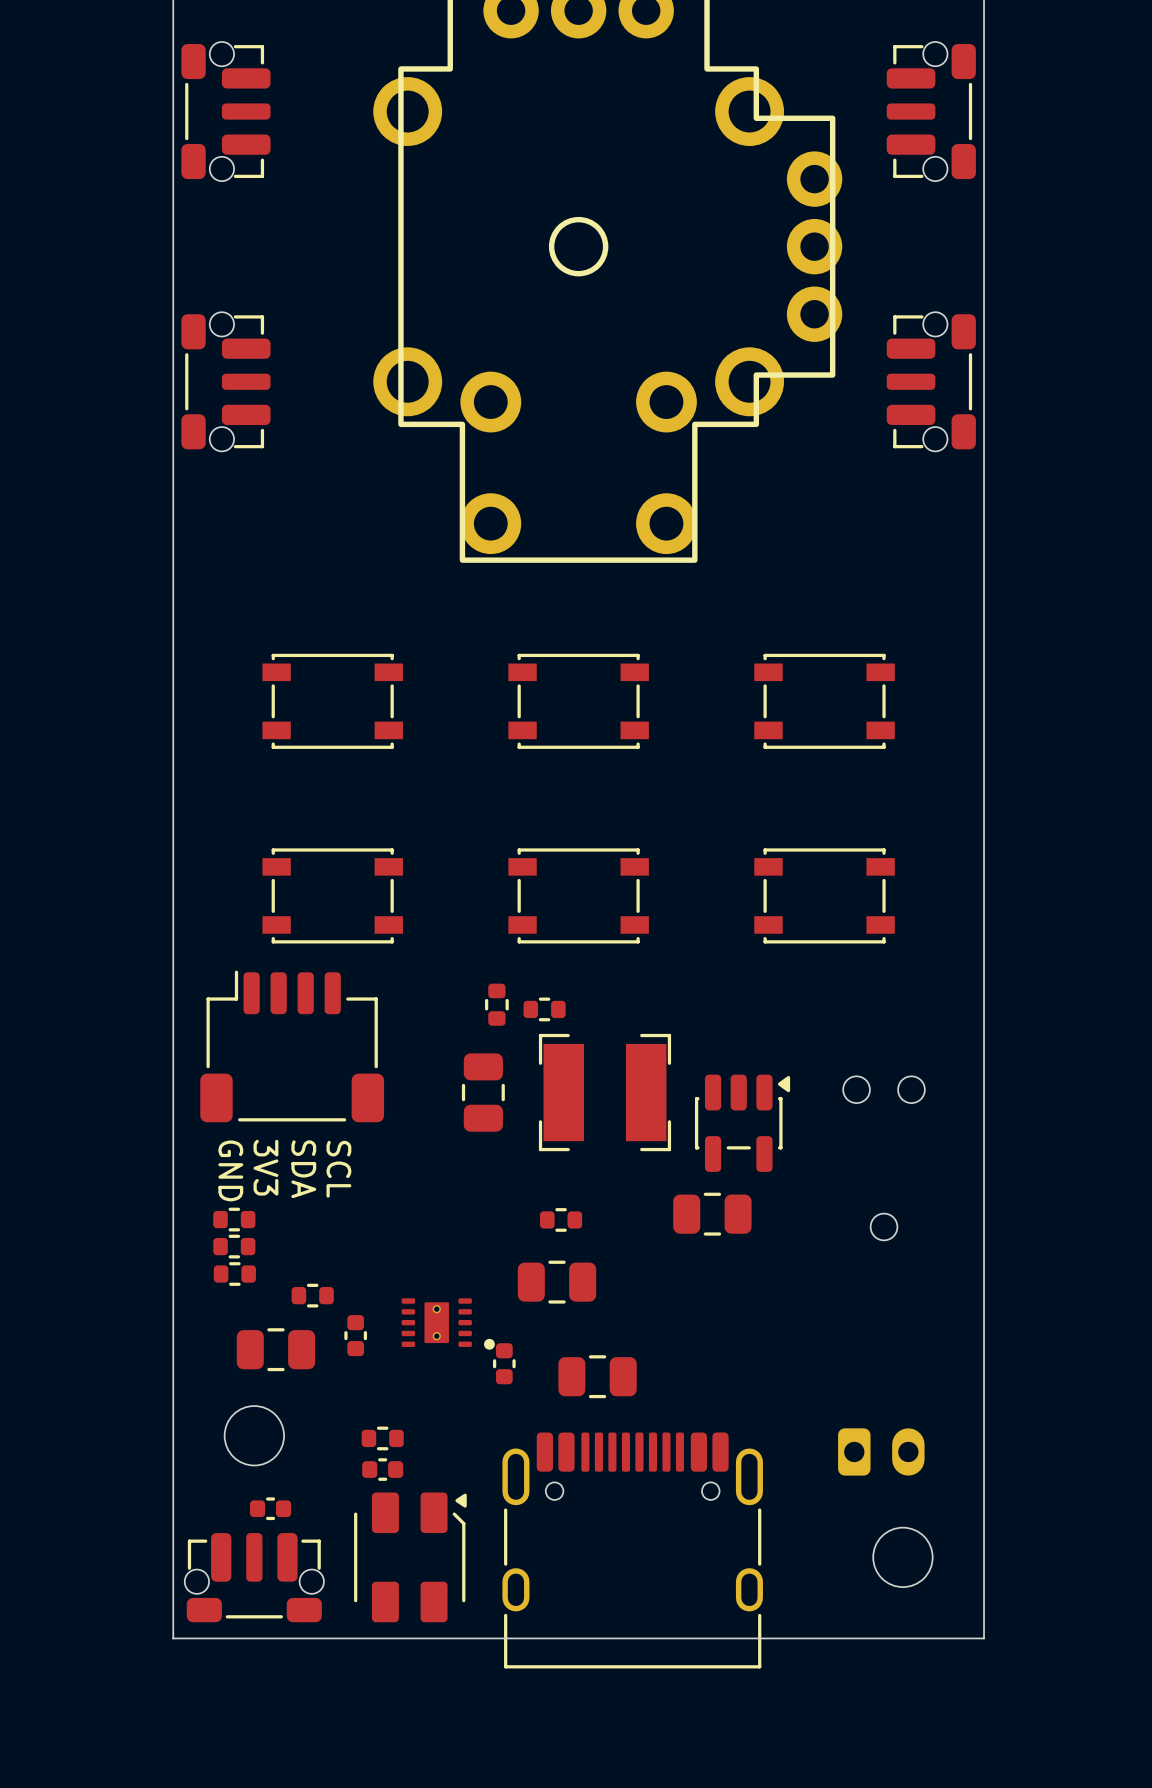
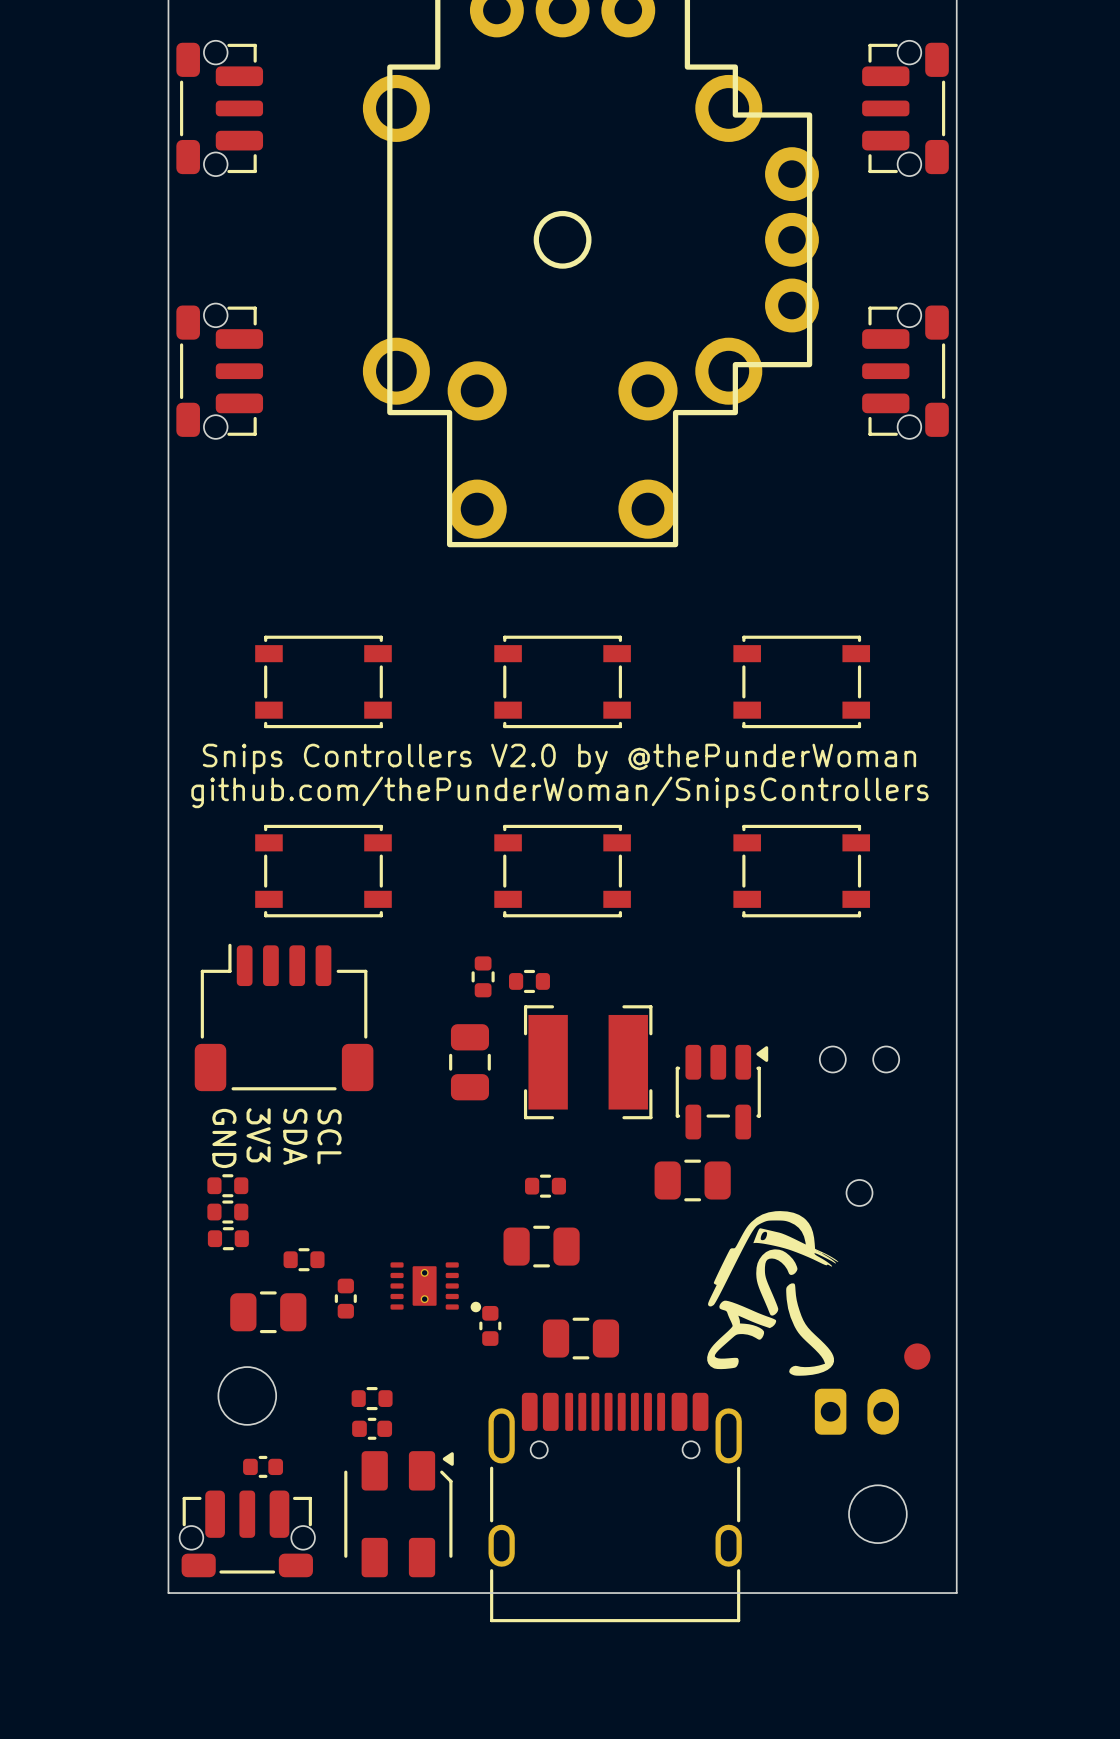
text: none -> Snips Controllers V2.0 by @thePunderWoman (559, 759)
text: none -> github.com/thePunderWoman/SnipsControllers (559, 792)
drawing: none -> [707, 1211, 839, 1376]
part: none -> (917, 1356)

